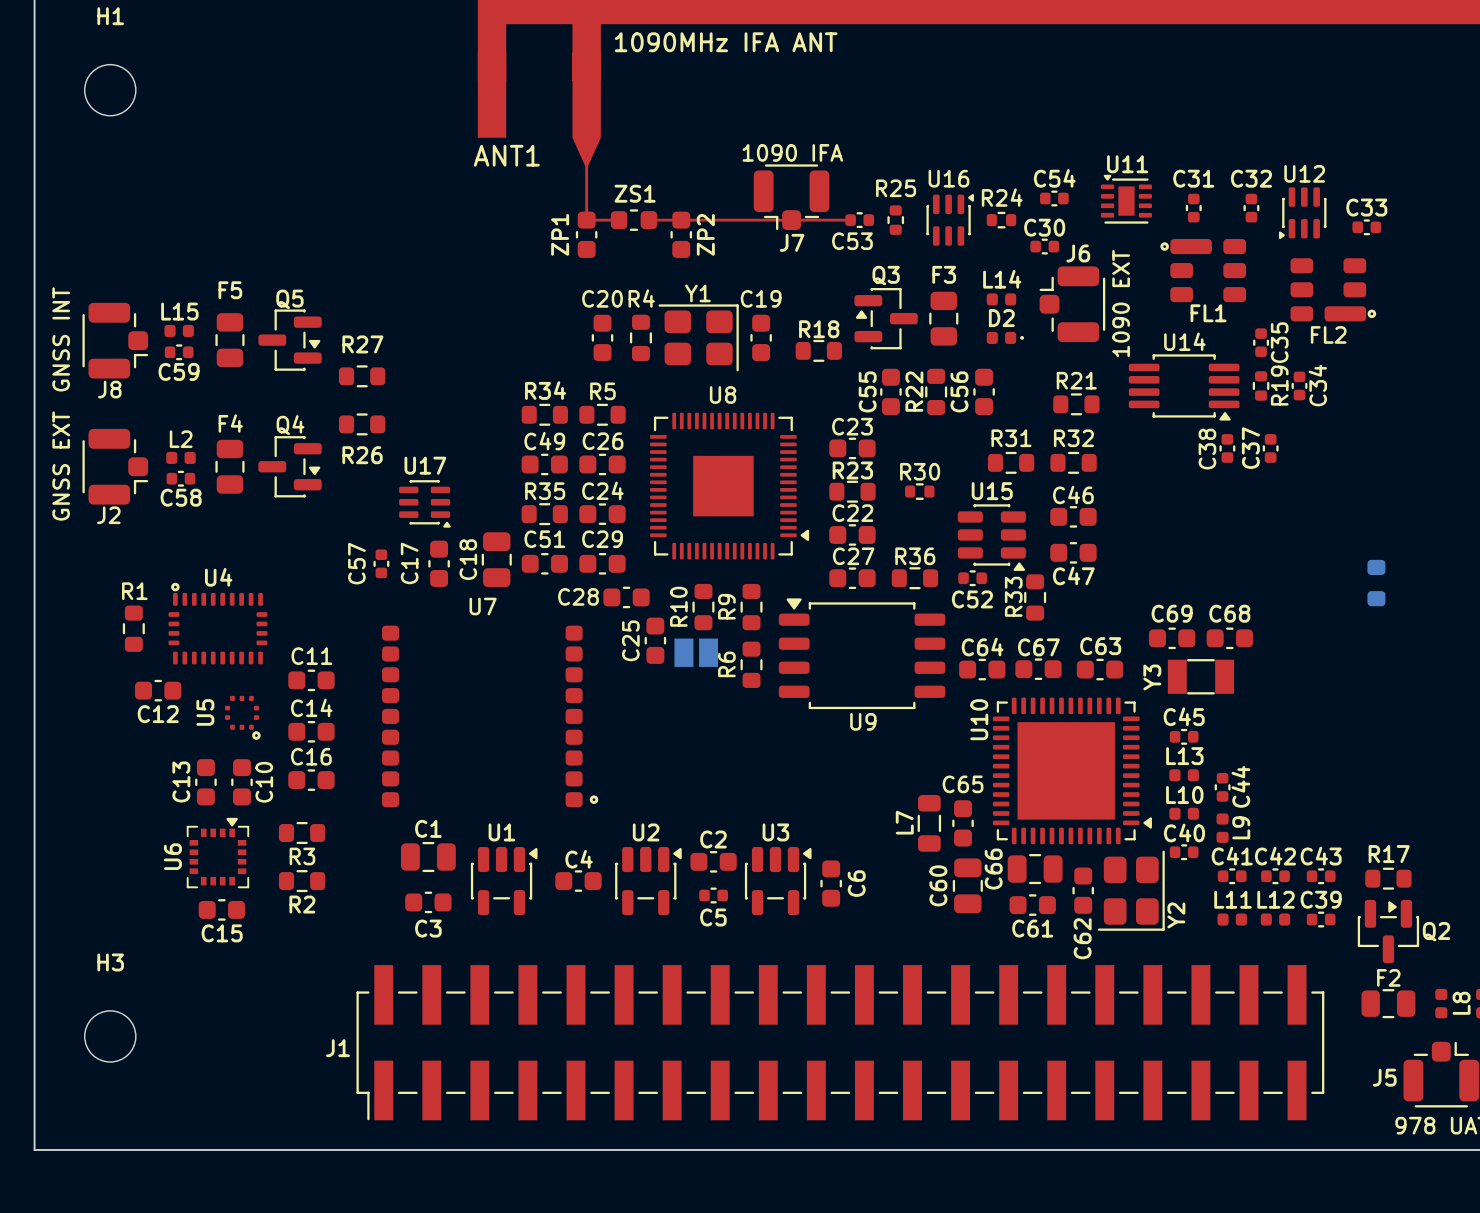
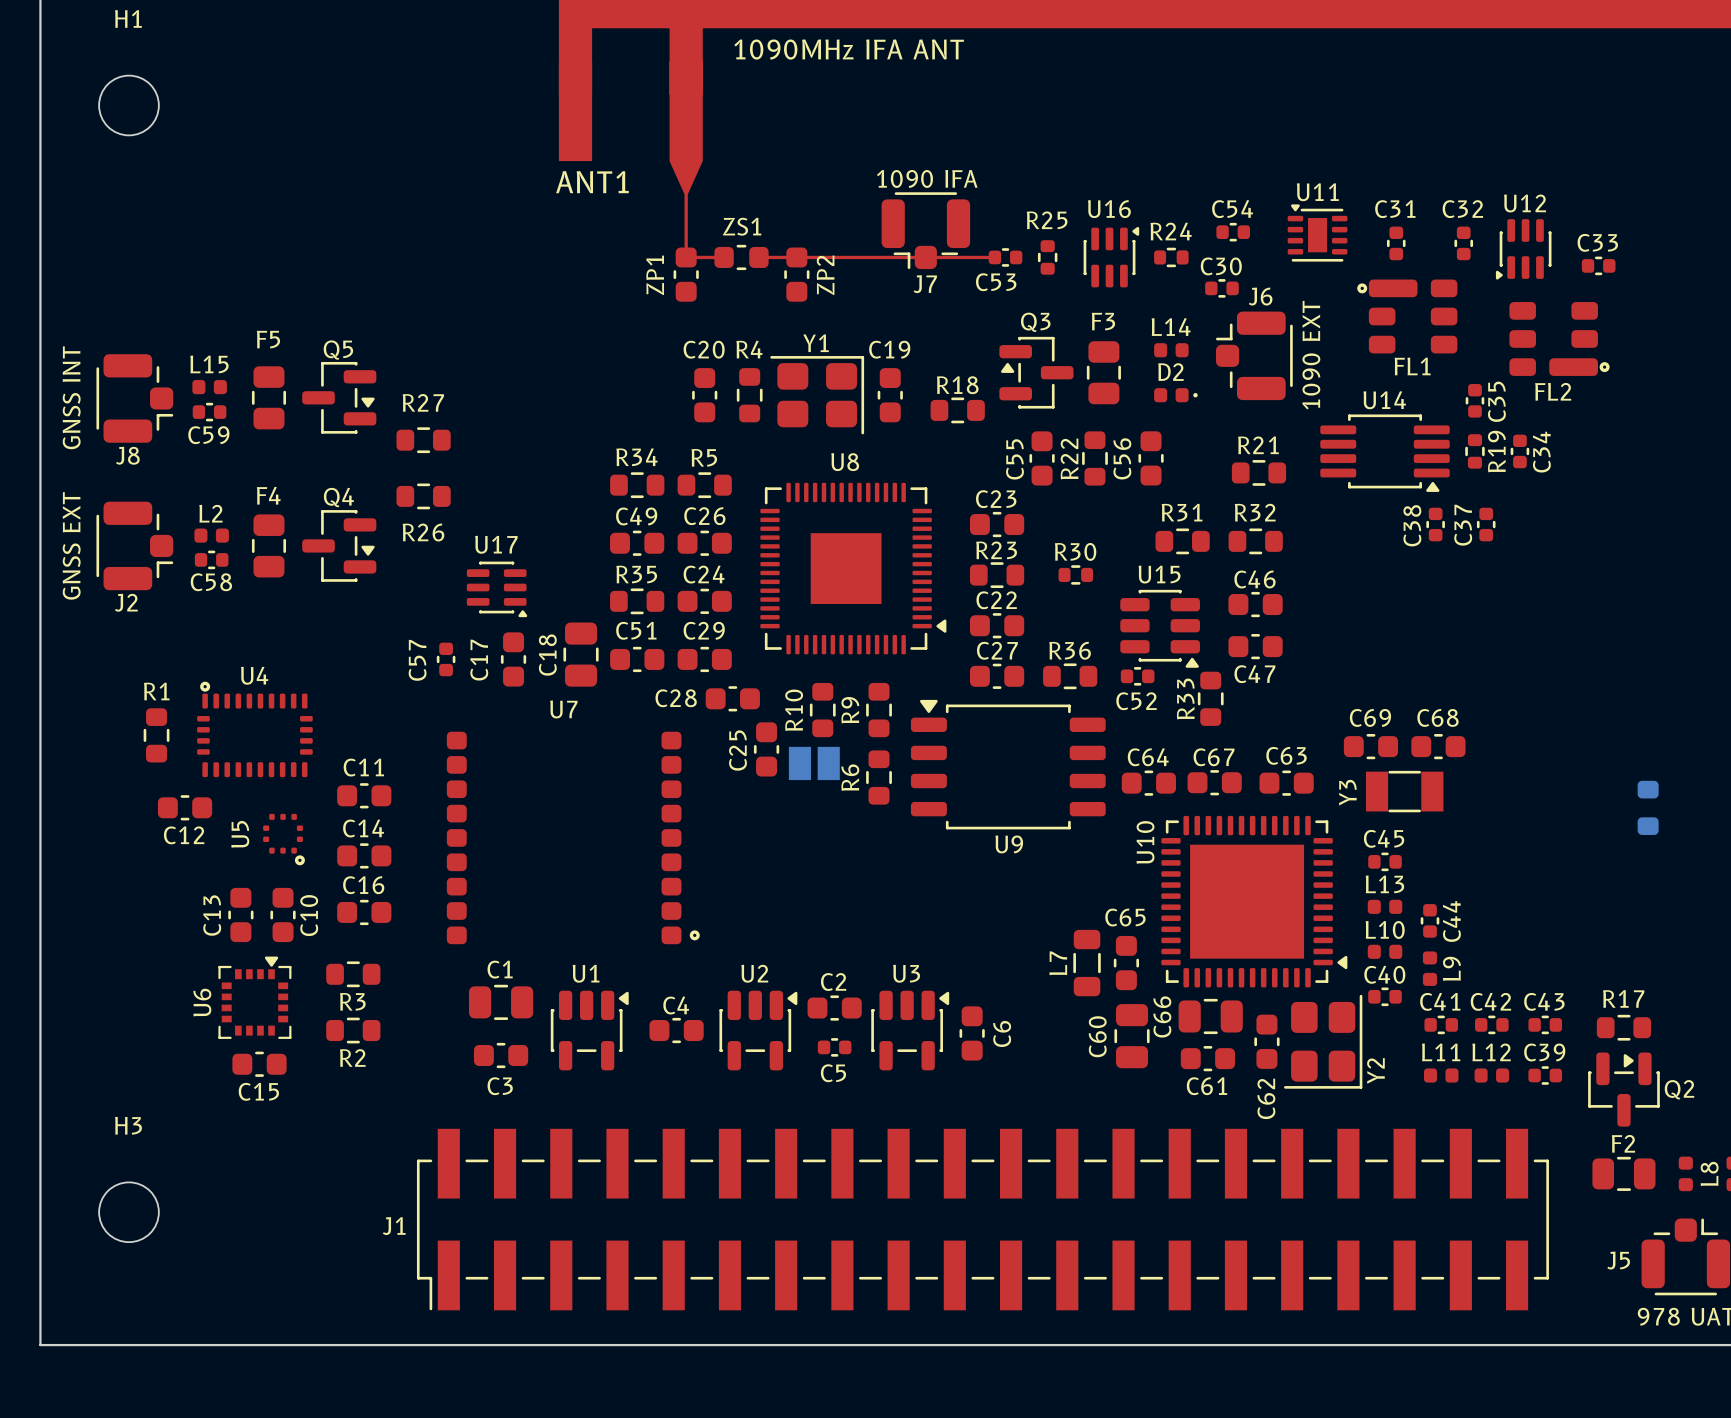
part: (1376, 583) -> none
part: none -> (1648, 807)

